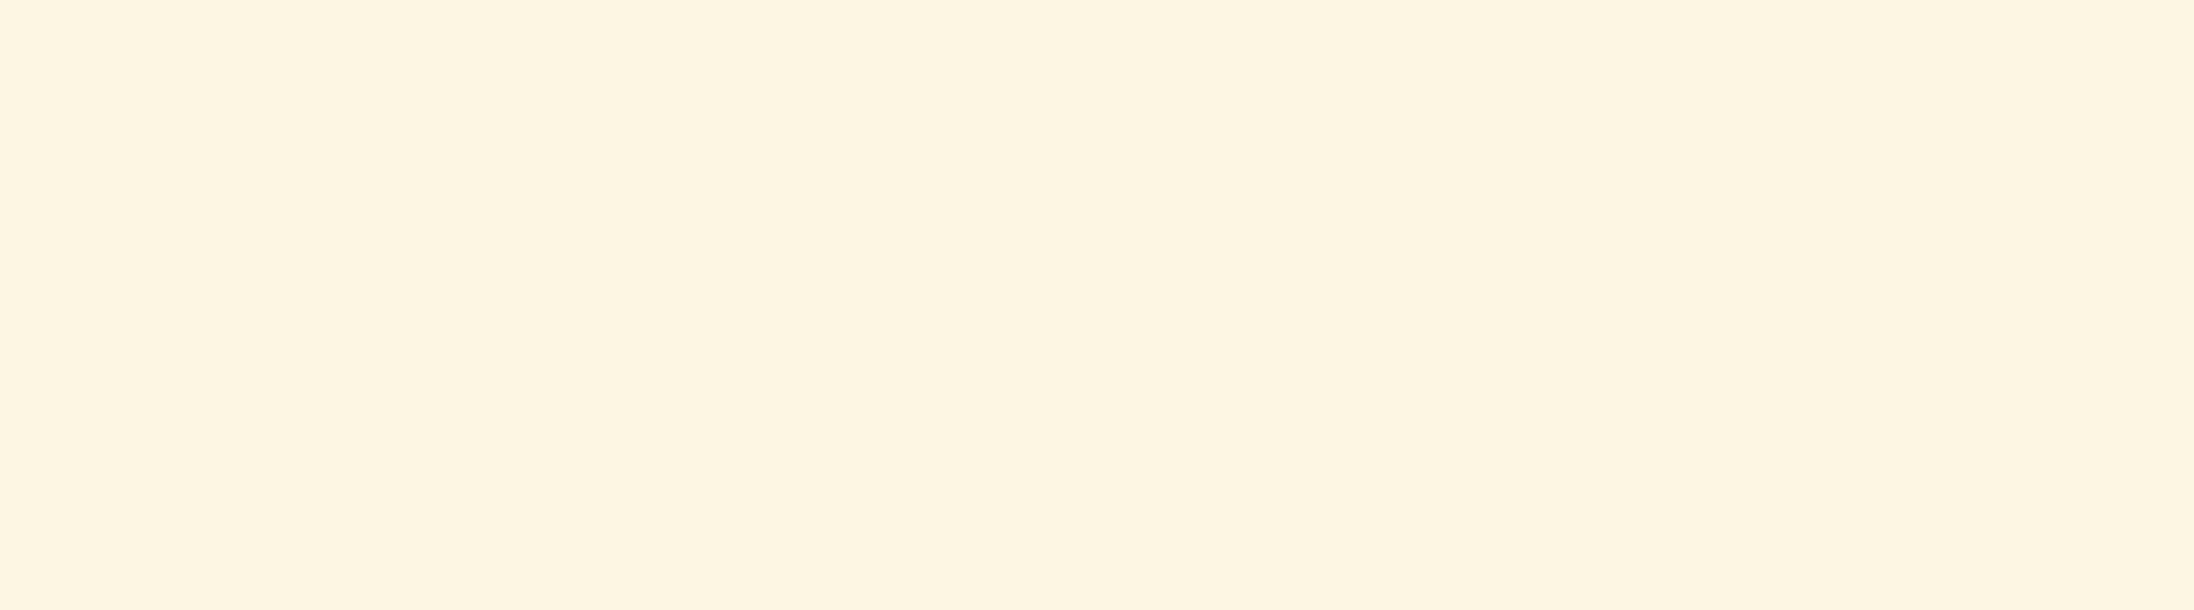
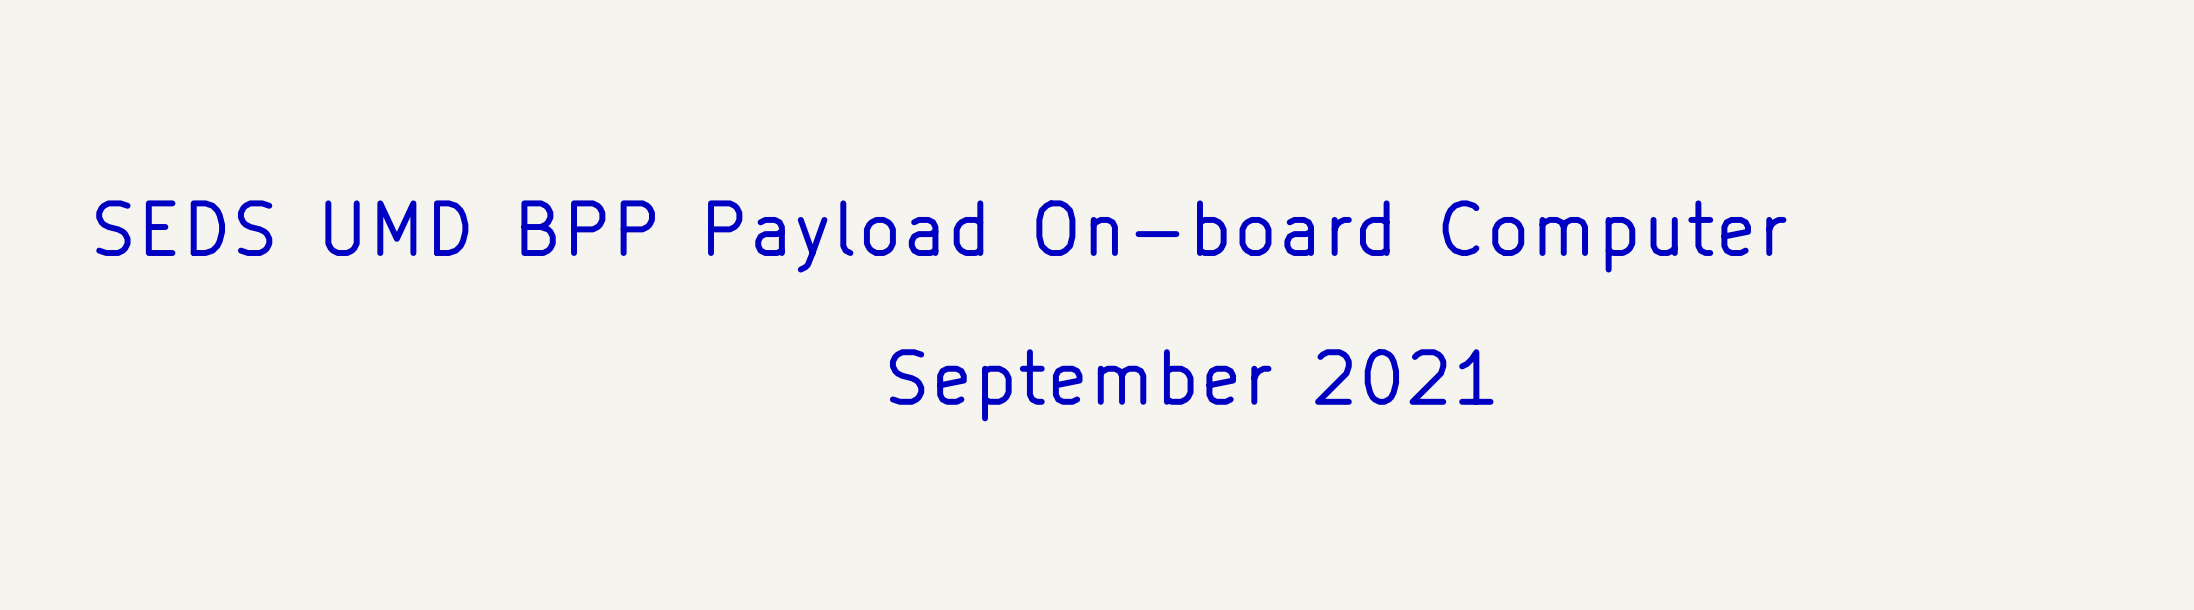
text: none -> SEDS UMD BPP Payload On-board Computer (941, 236)
text: none -> September 2021 (1191, 385)

